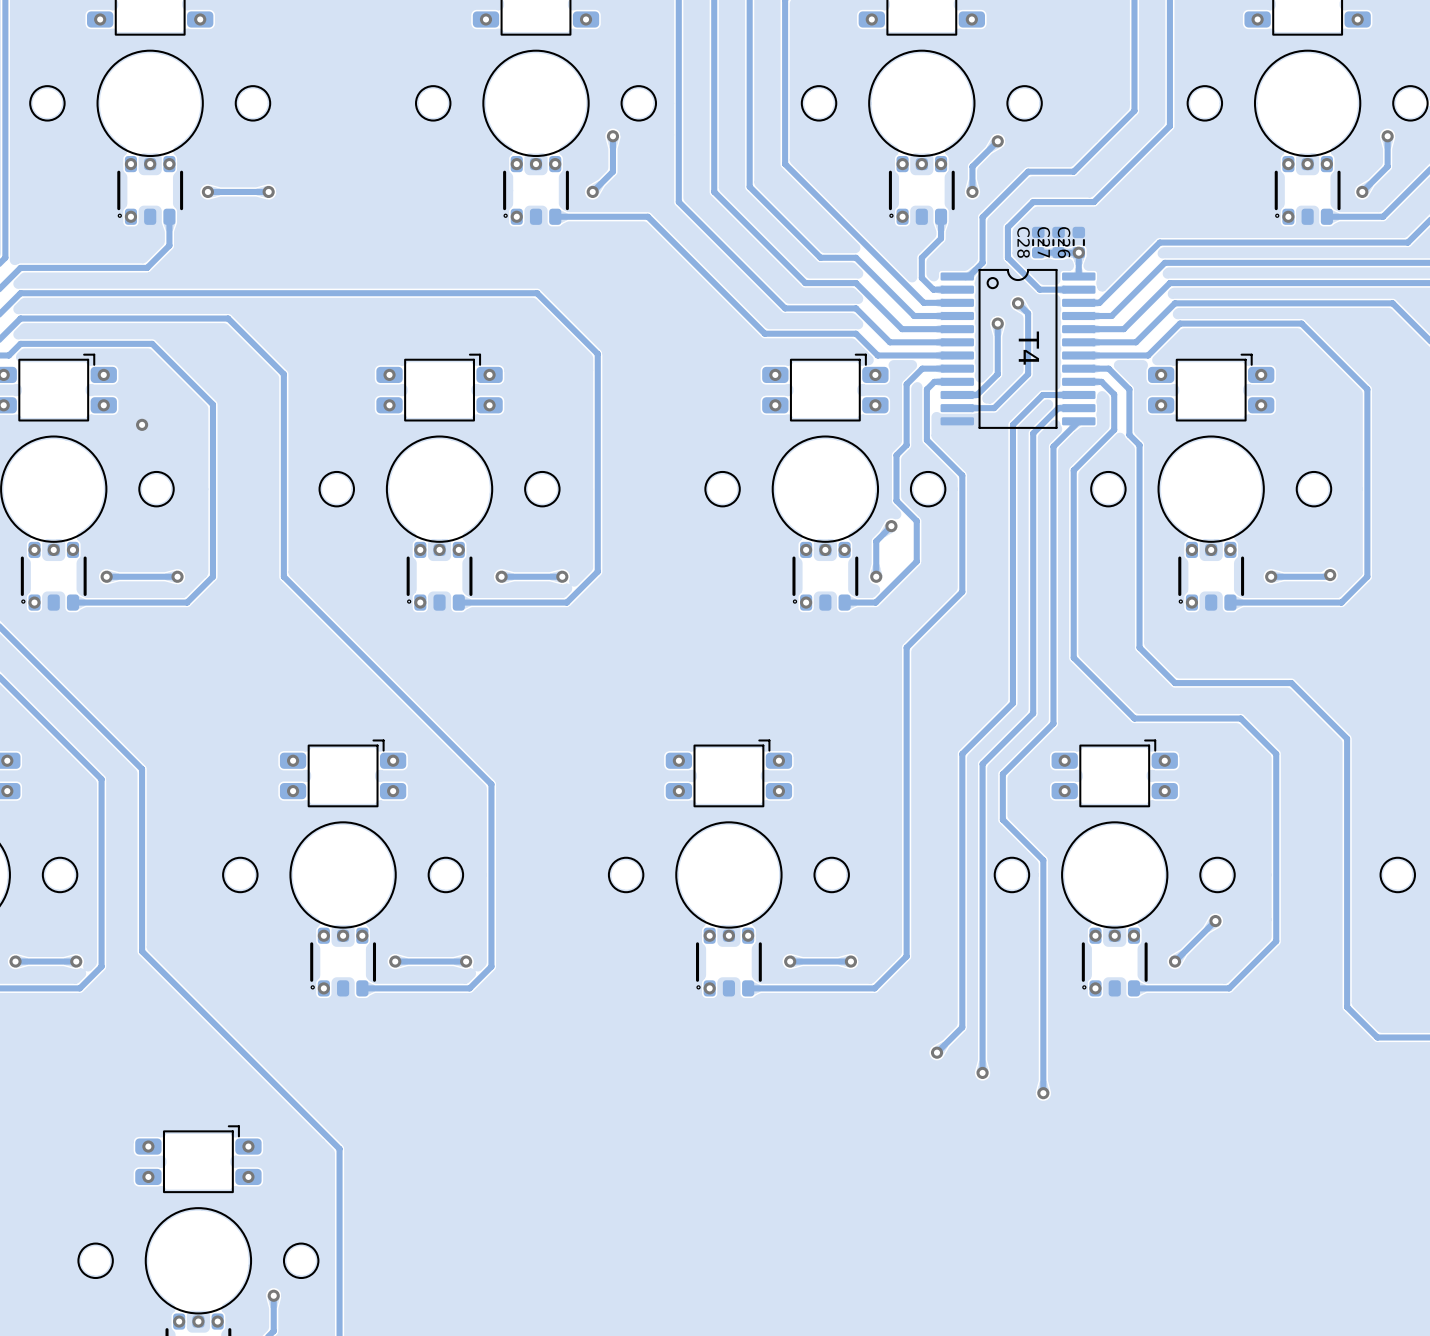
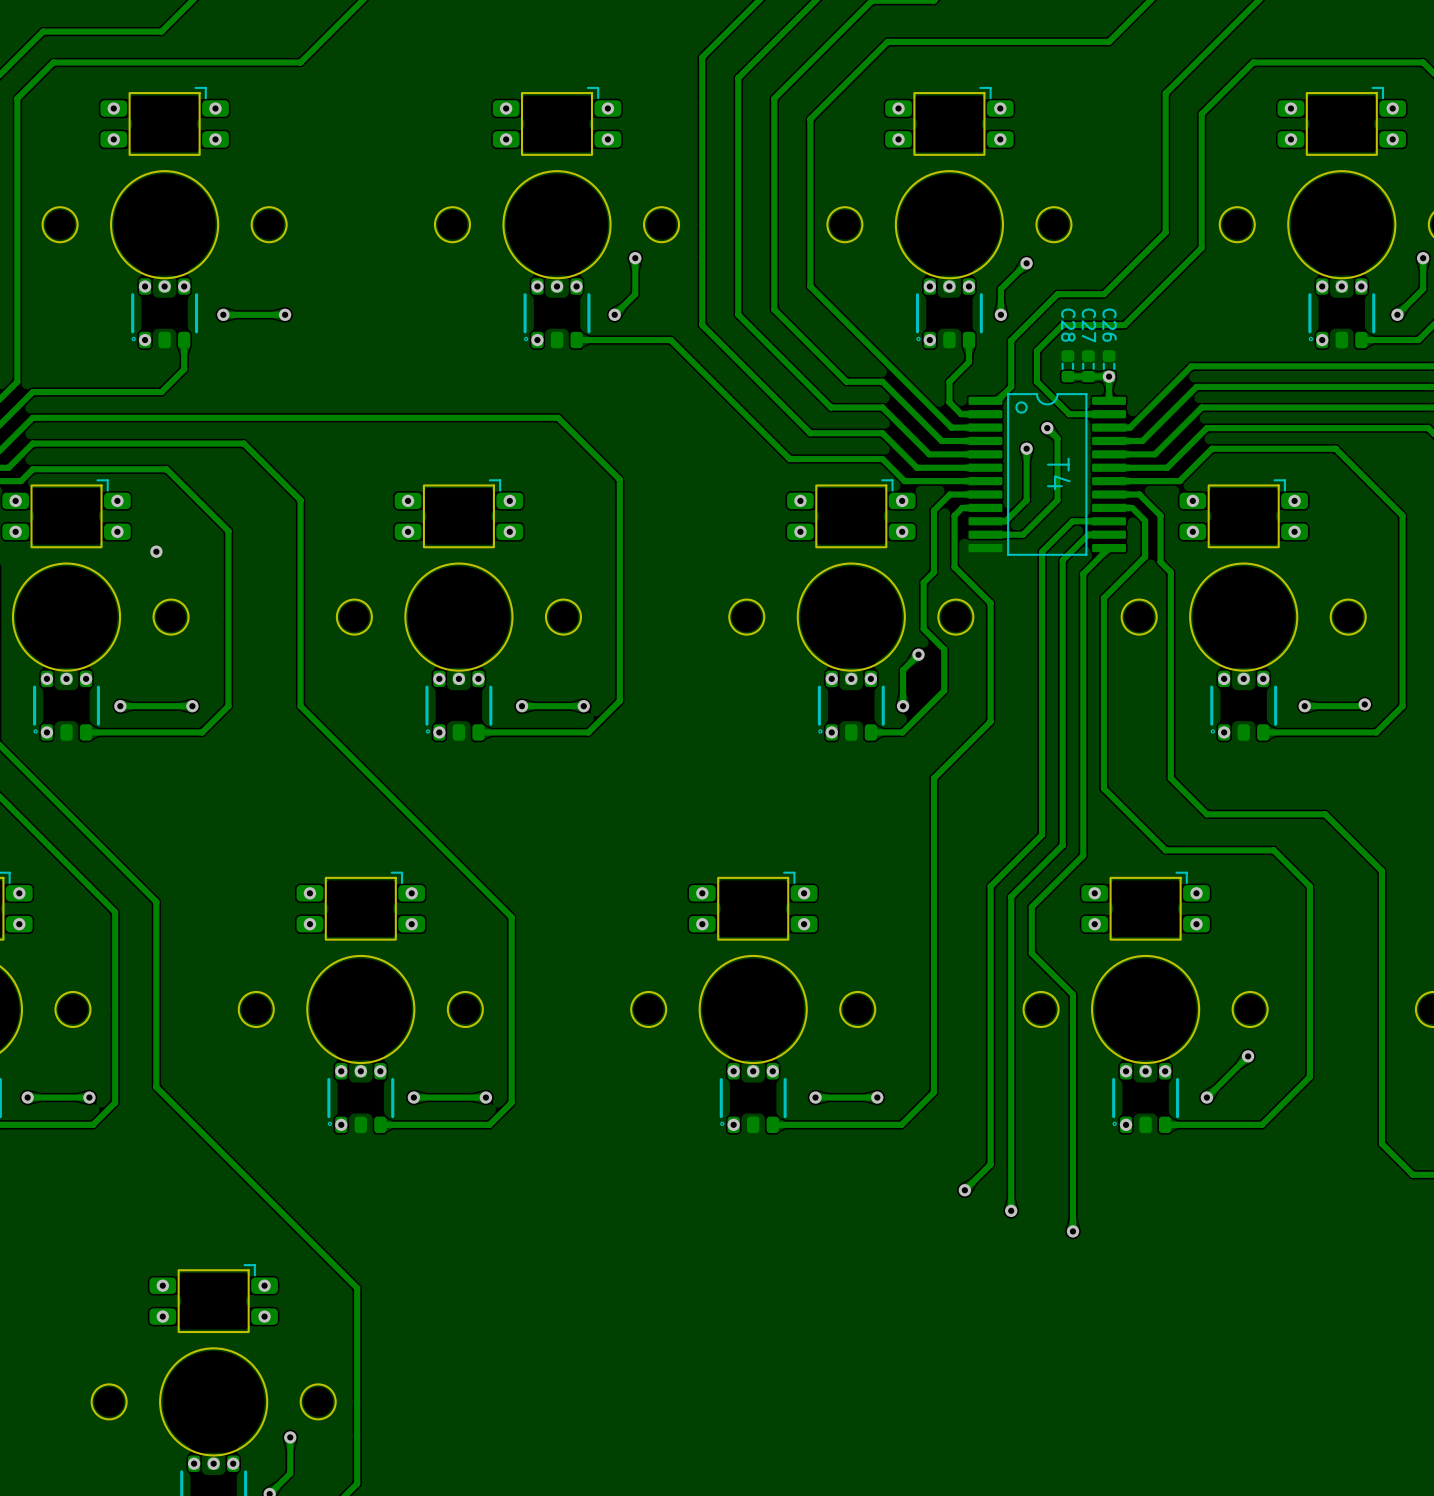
C28 name position: C28 (1023, 242) -> C28 (1068, 325)
C27 name position: C27 (1043, 242) -> C27 (1088, 325)
C26 name position: C26 (1064, 242) -> C26 (1109, 325)

